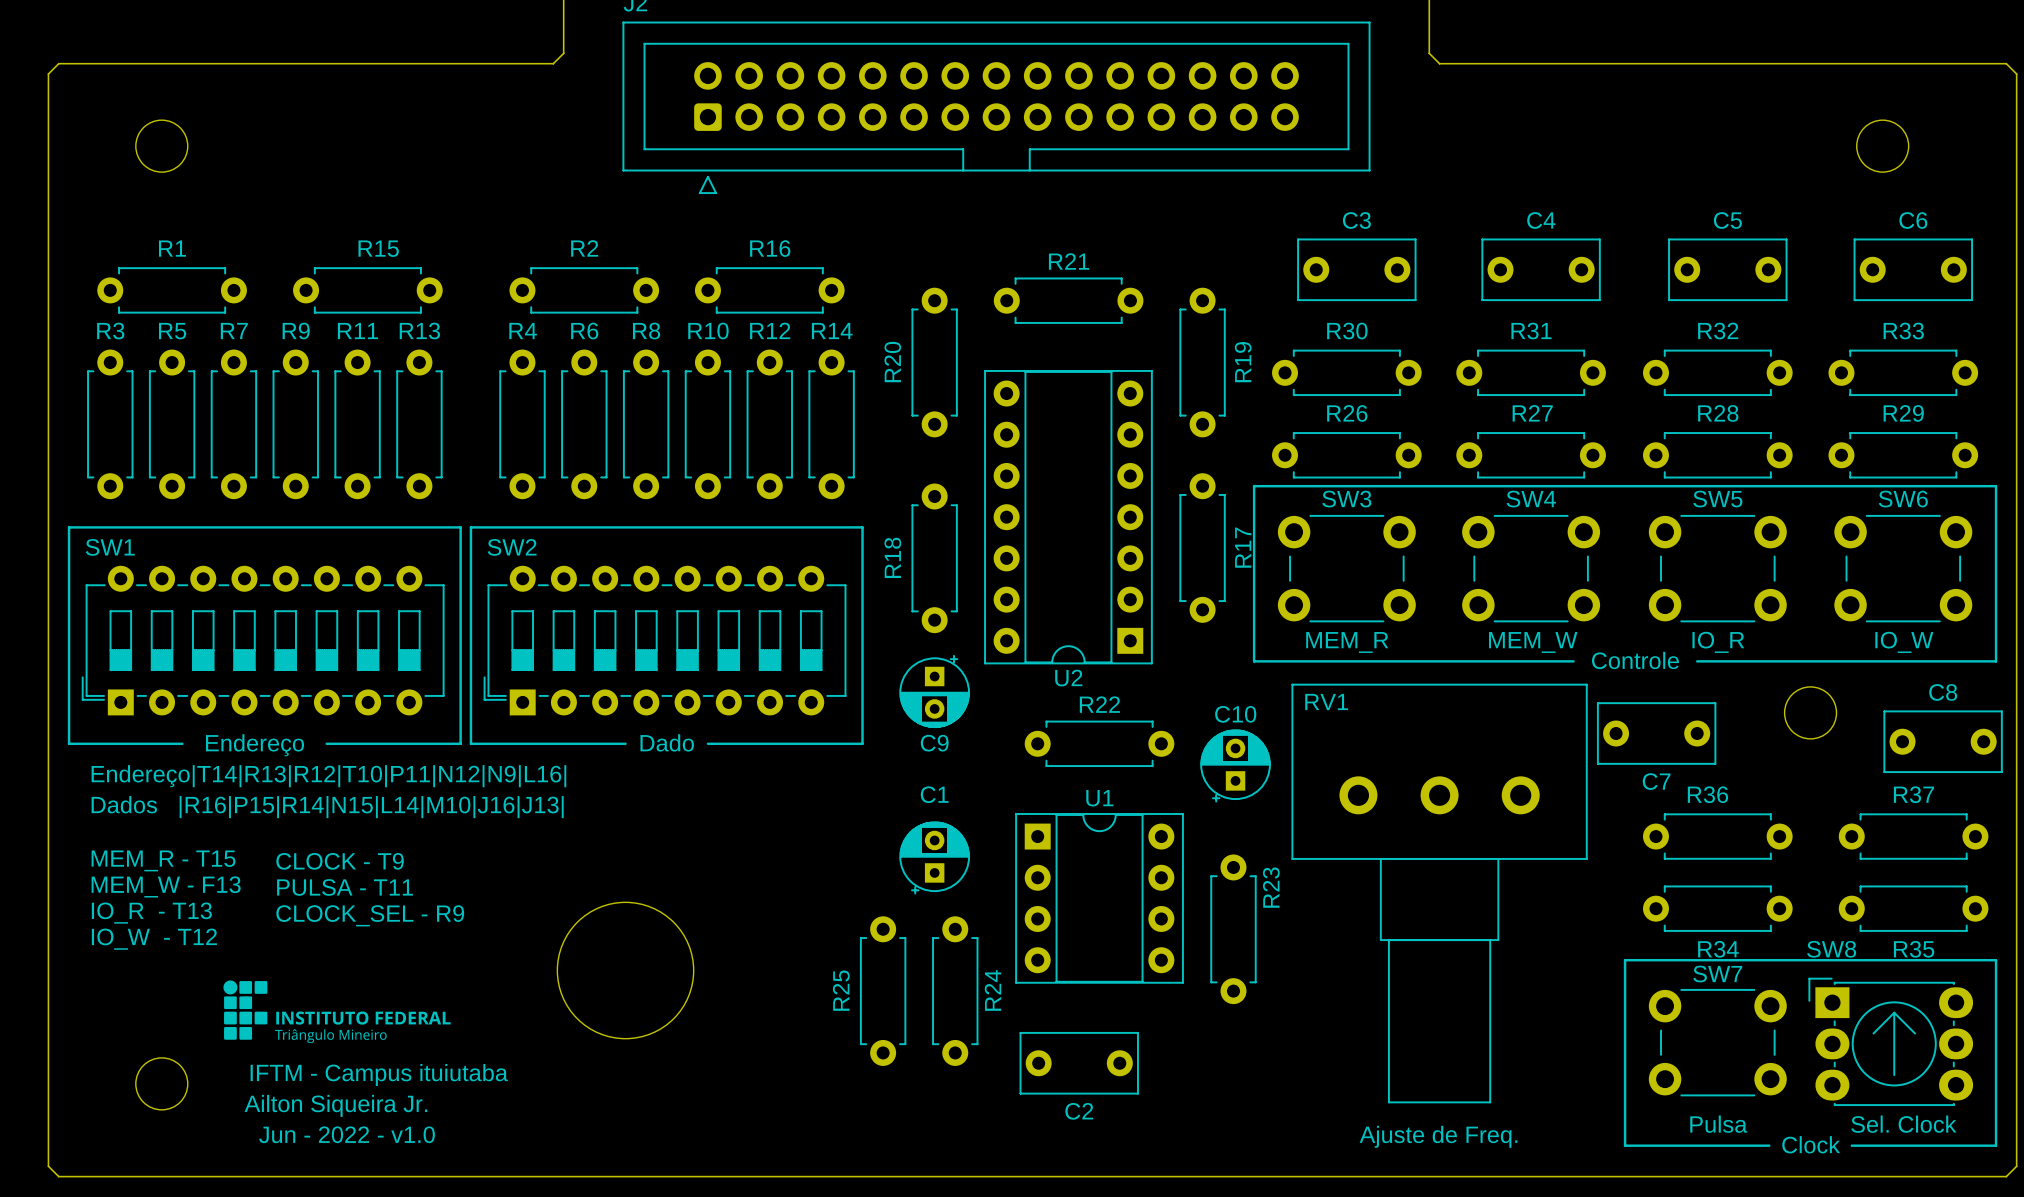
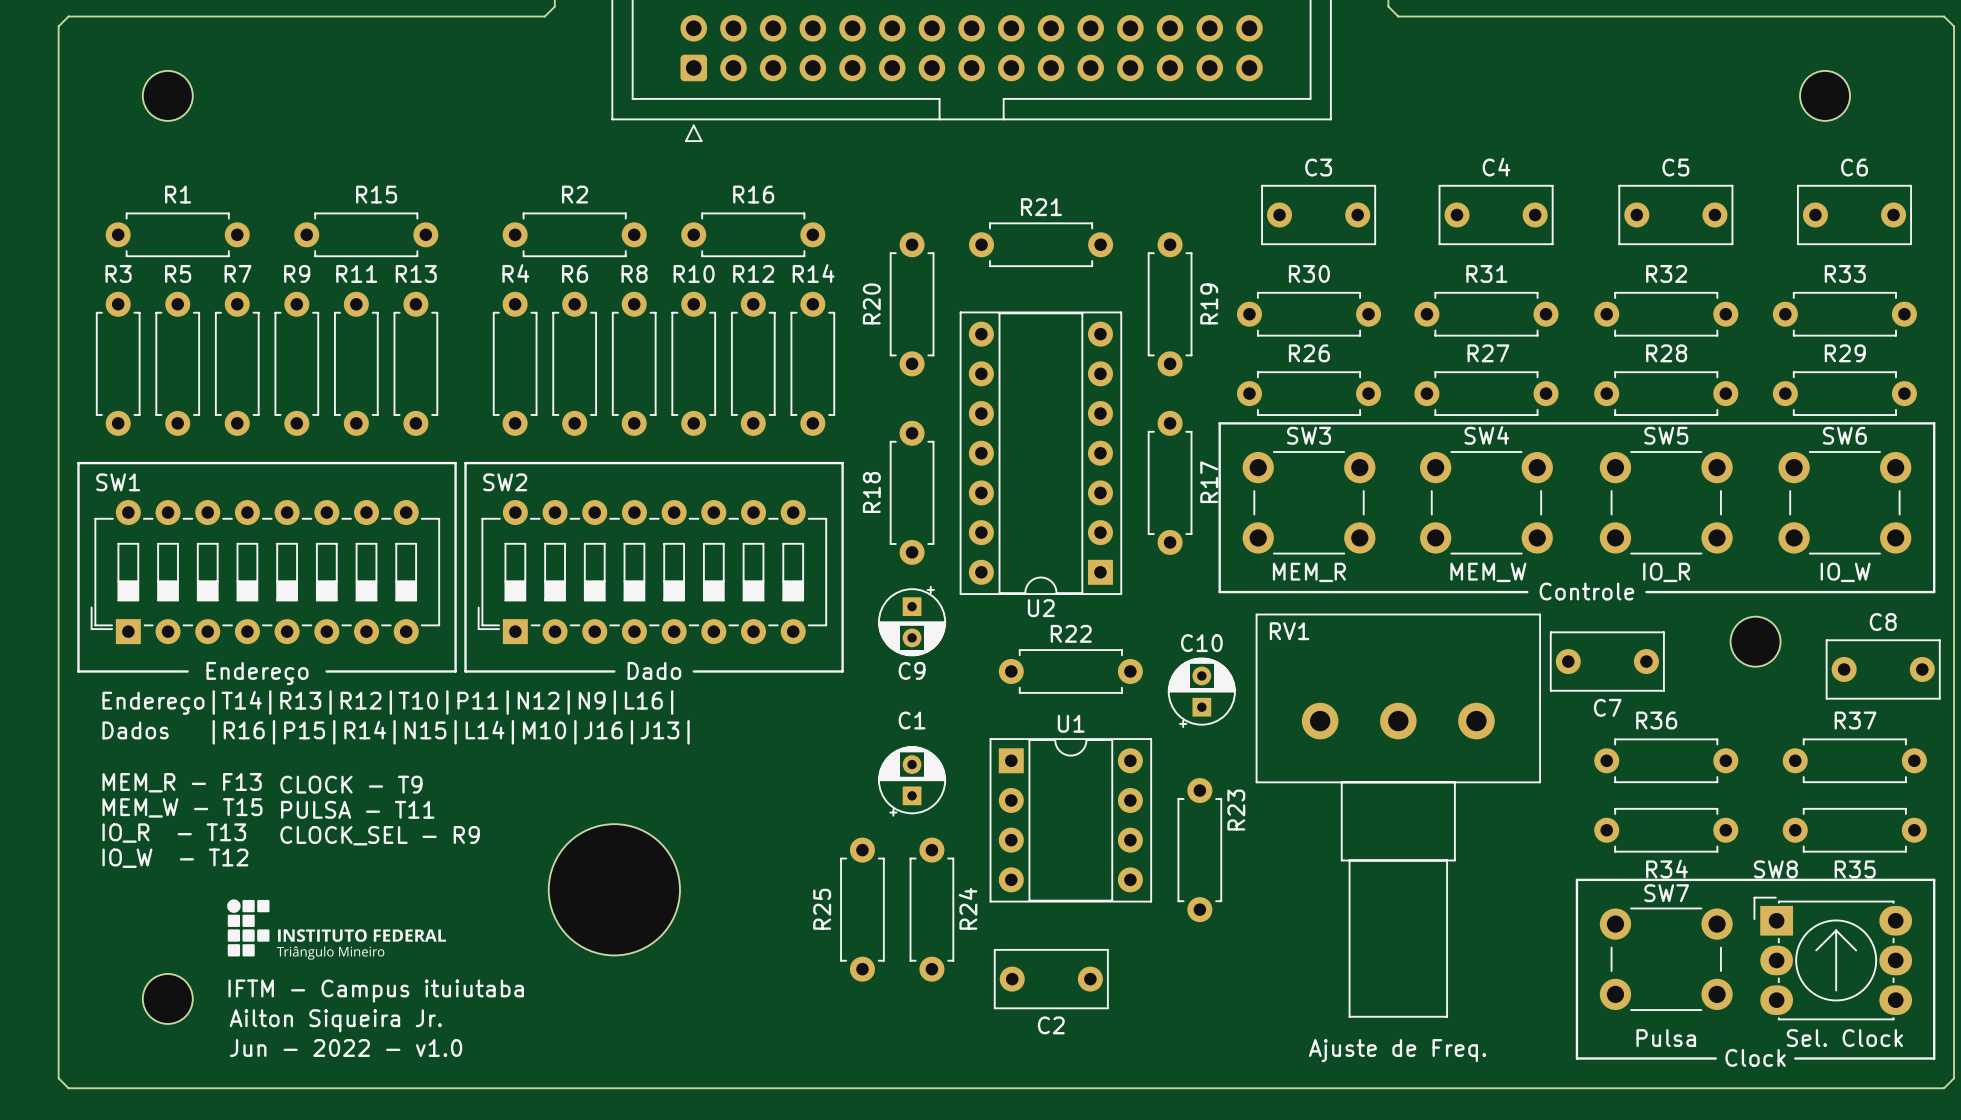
text: MEM_R - T15 (163, 860) -> MEM_R - F13 (182, 782)
text: MEM_W - F13 (166, 886) -> MEM_W - T15 (182, 807)

